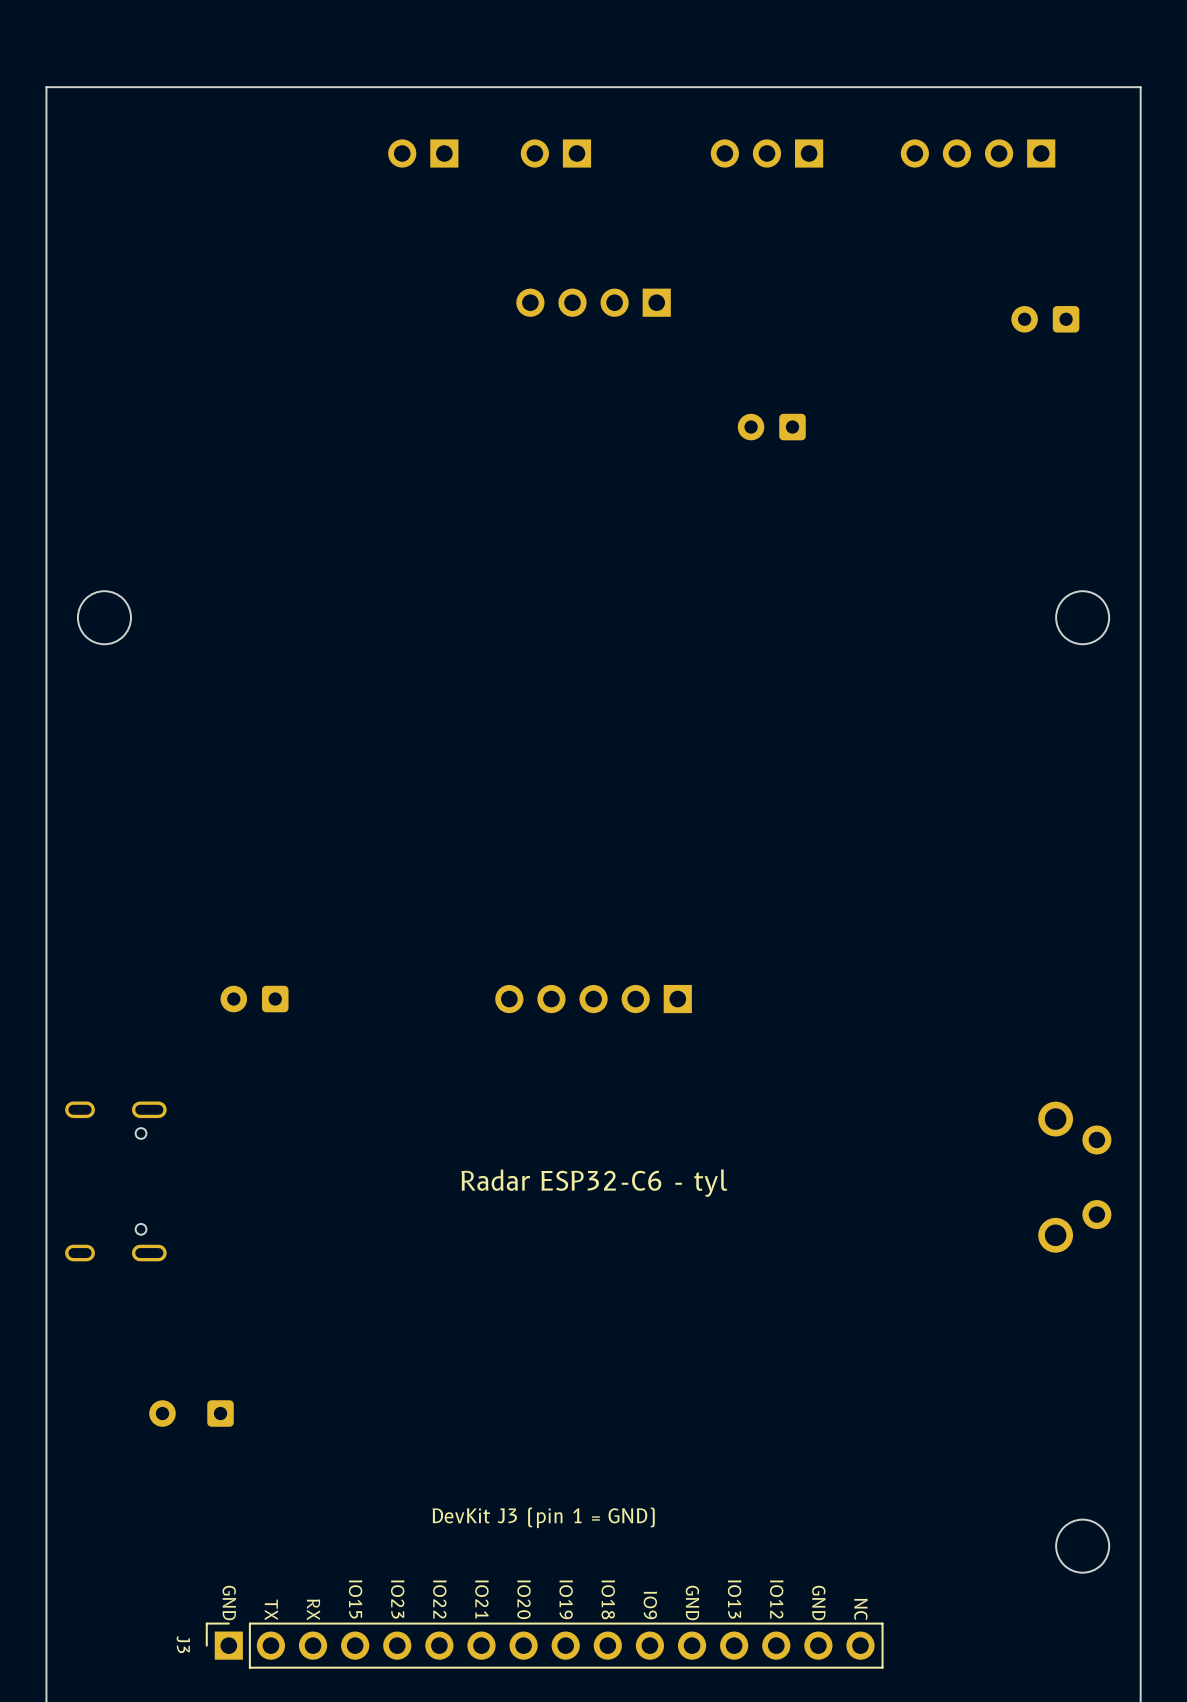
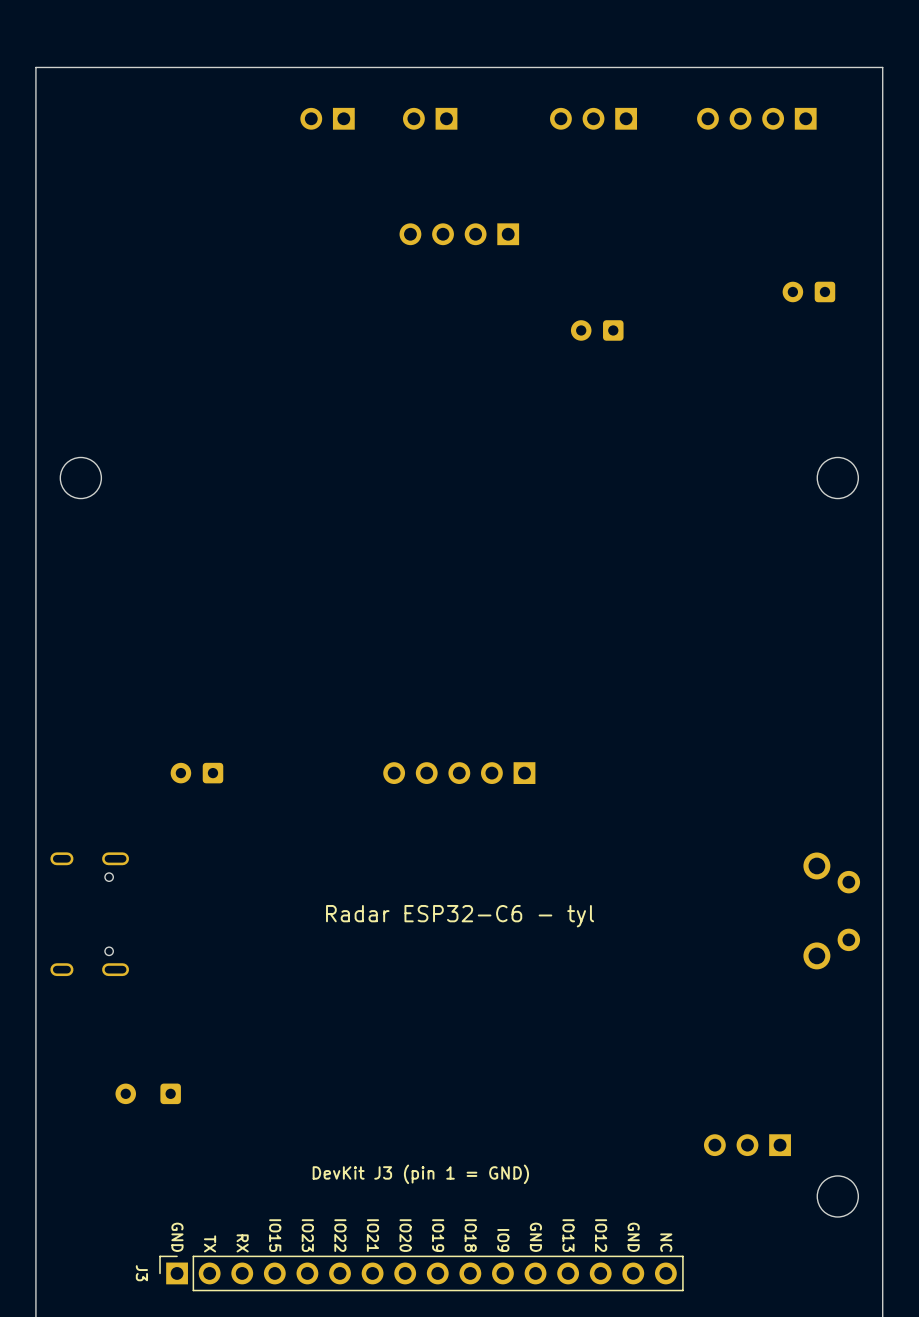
part position: (1045, 319) -> (808, 291)
part: none -> (747, 1145)

